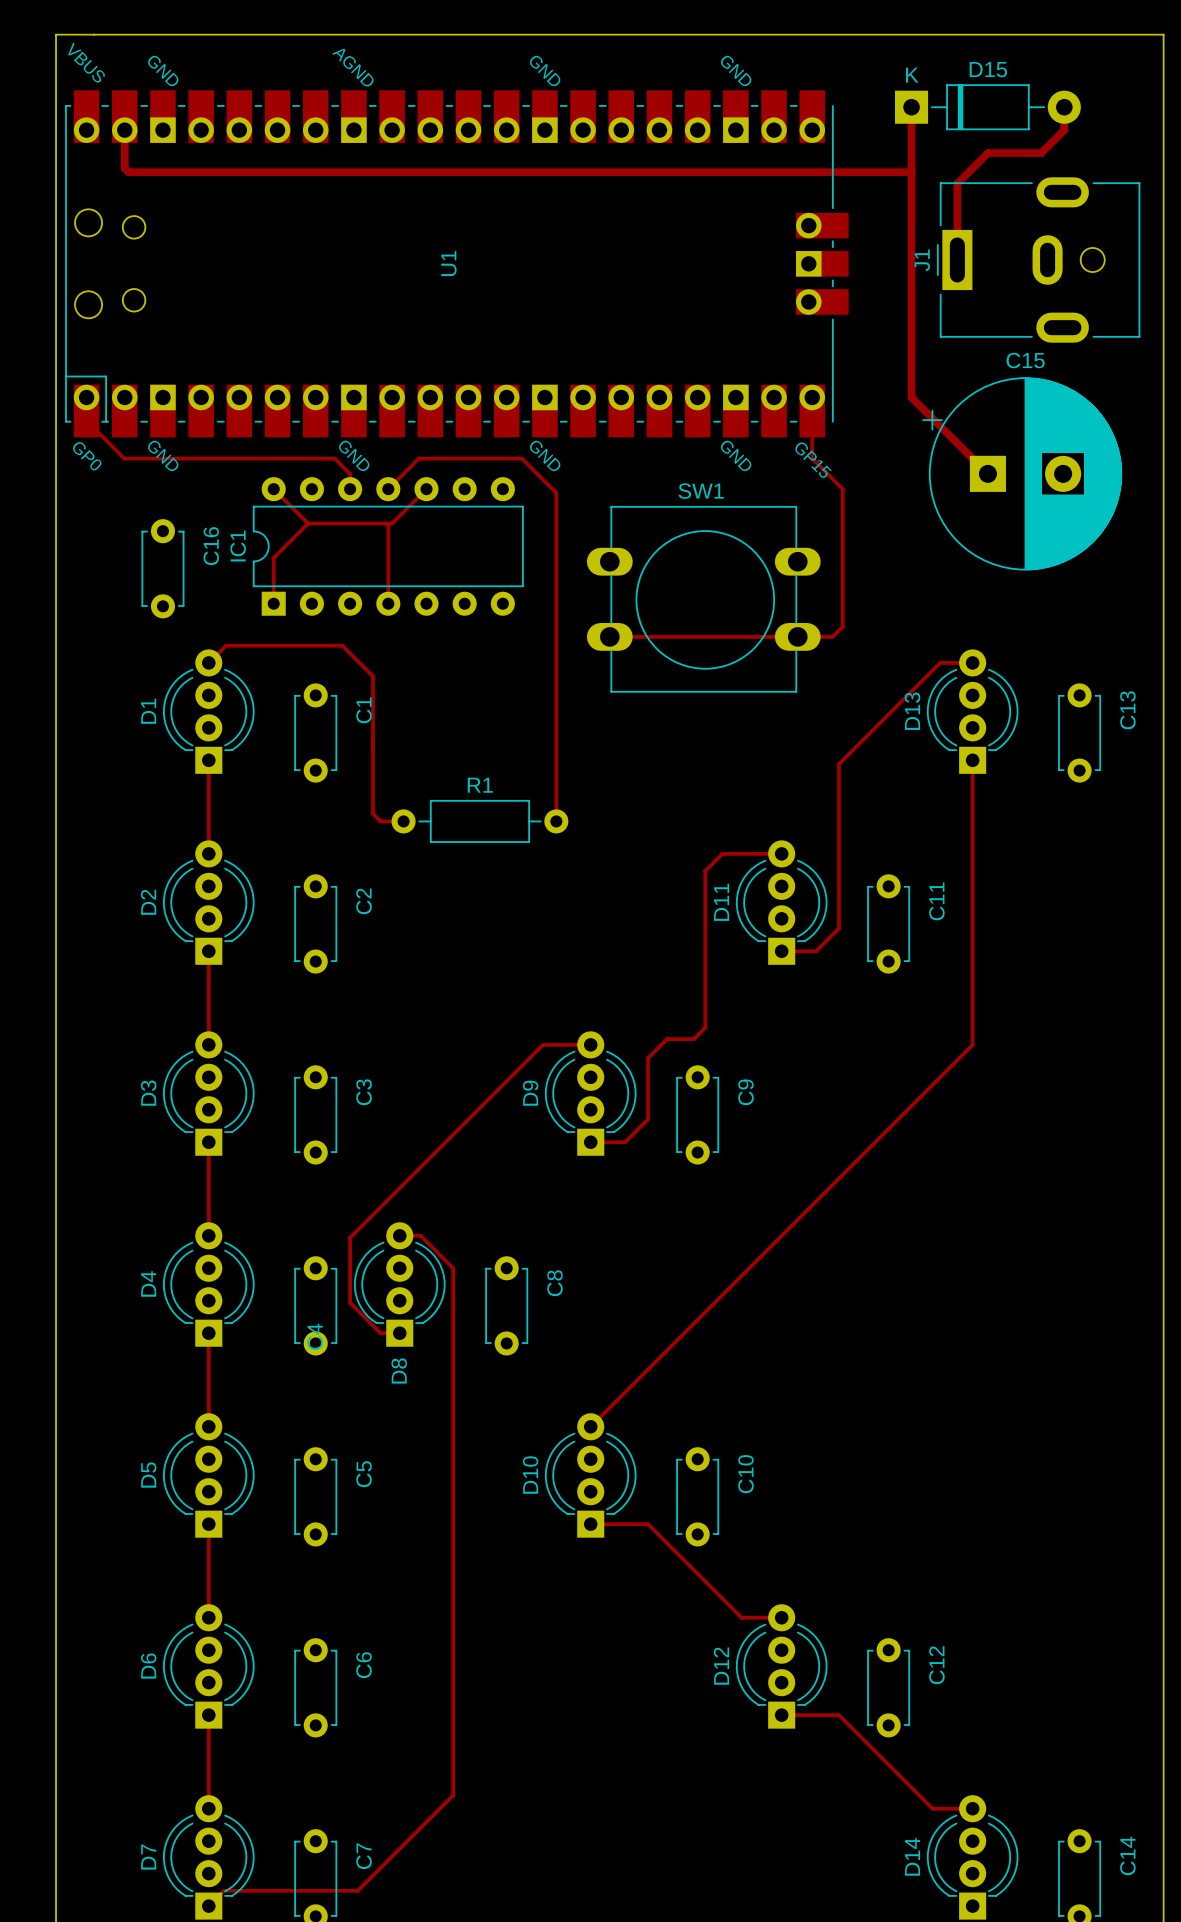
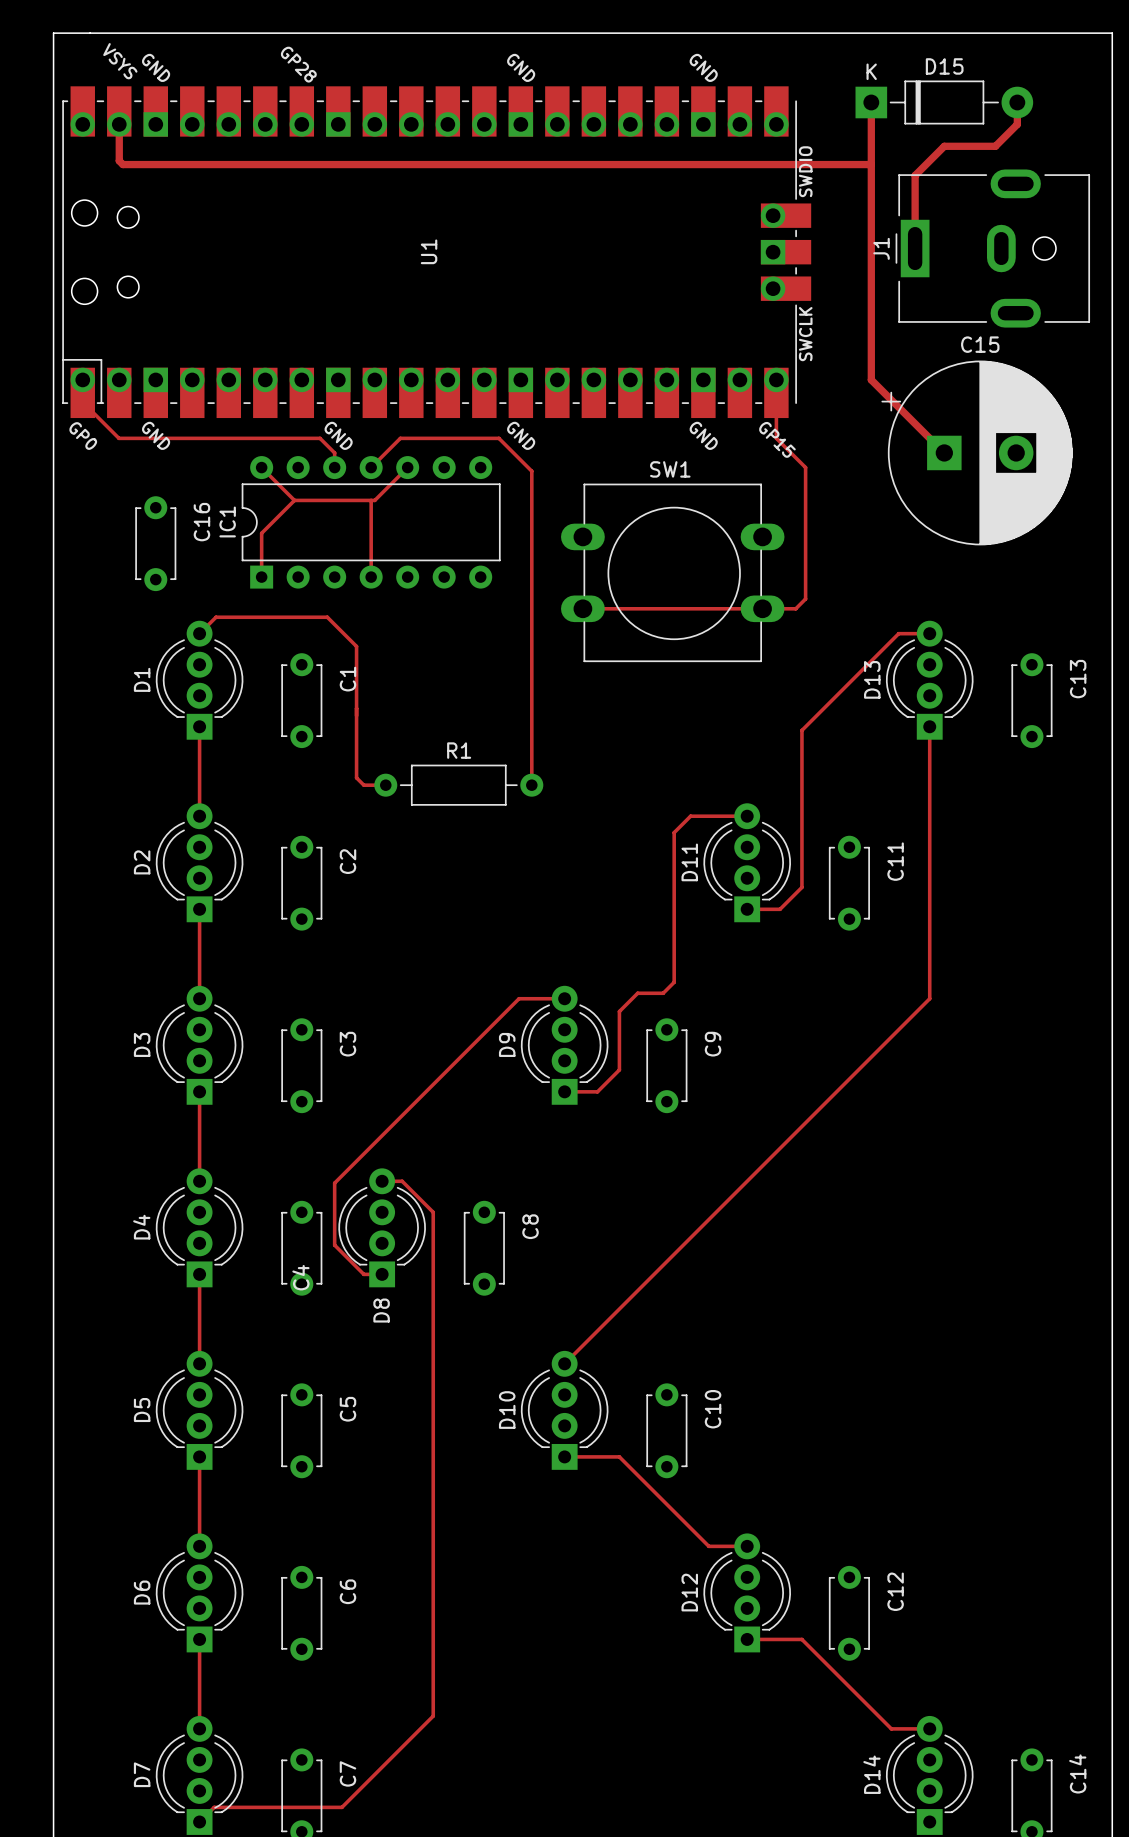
U1 text: VBUS (86, 62) -> none
U1 text: none -> VSYS (120, 61)
U1 text: none -> GP28 (298, 64)
U1 text: AGND (352, 67) -> none
U1 text: none -> SWDIO (805, 171)
U1 text: none -> SWCLK (805, 334)

